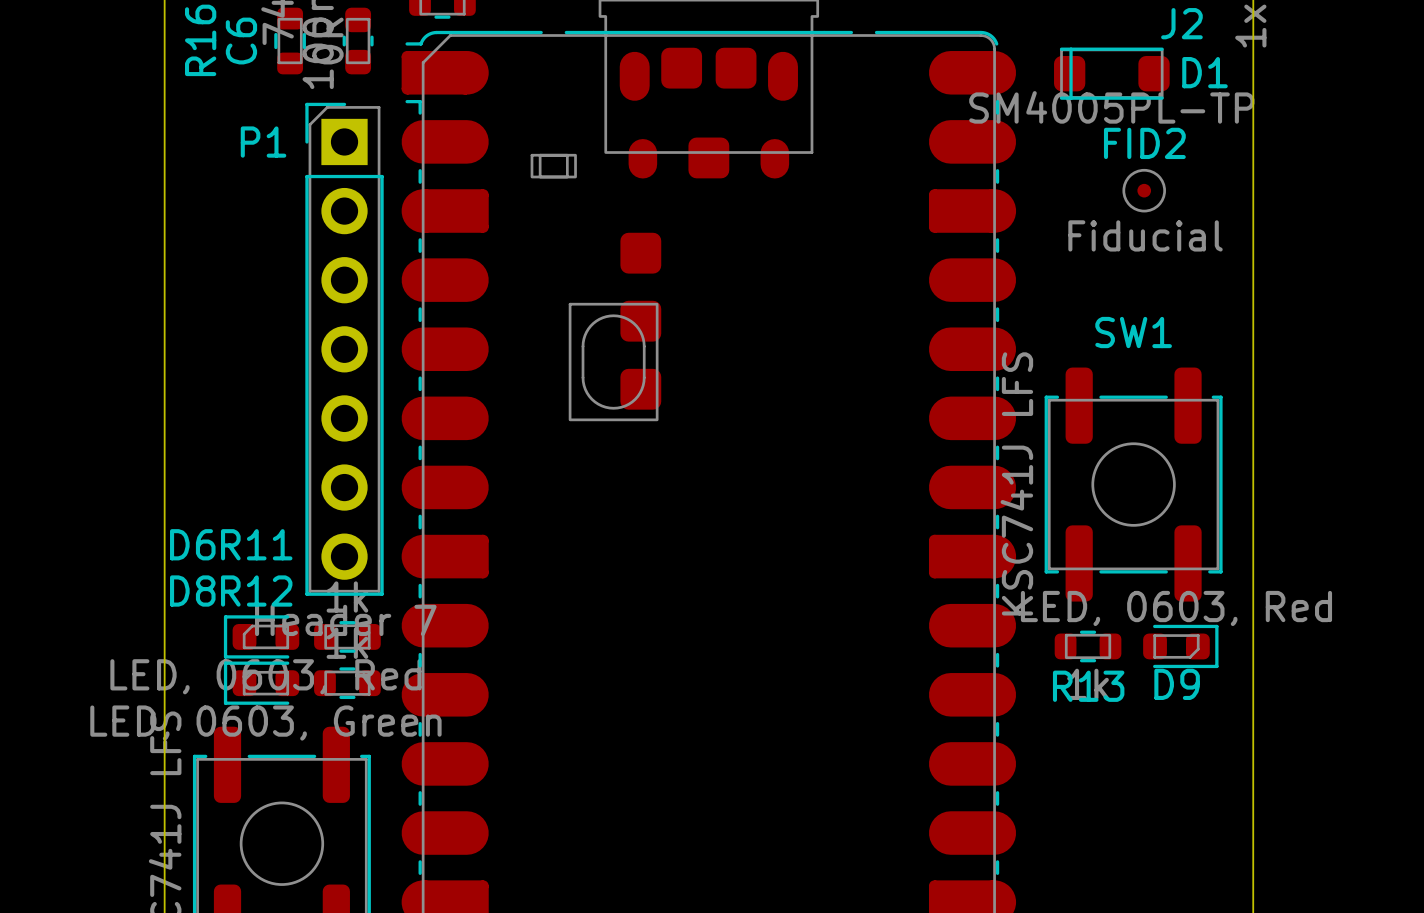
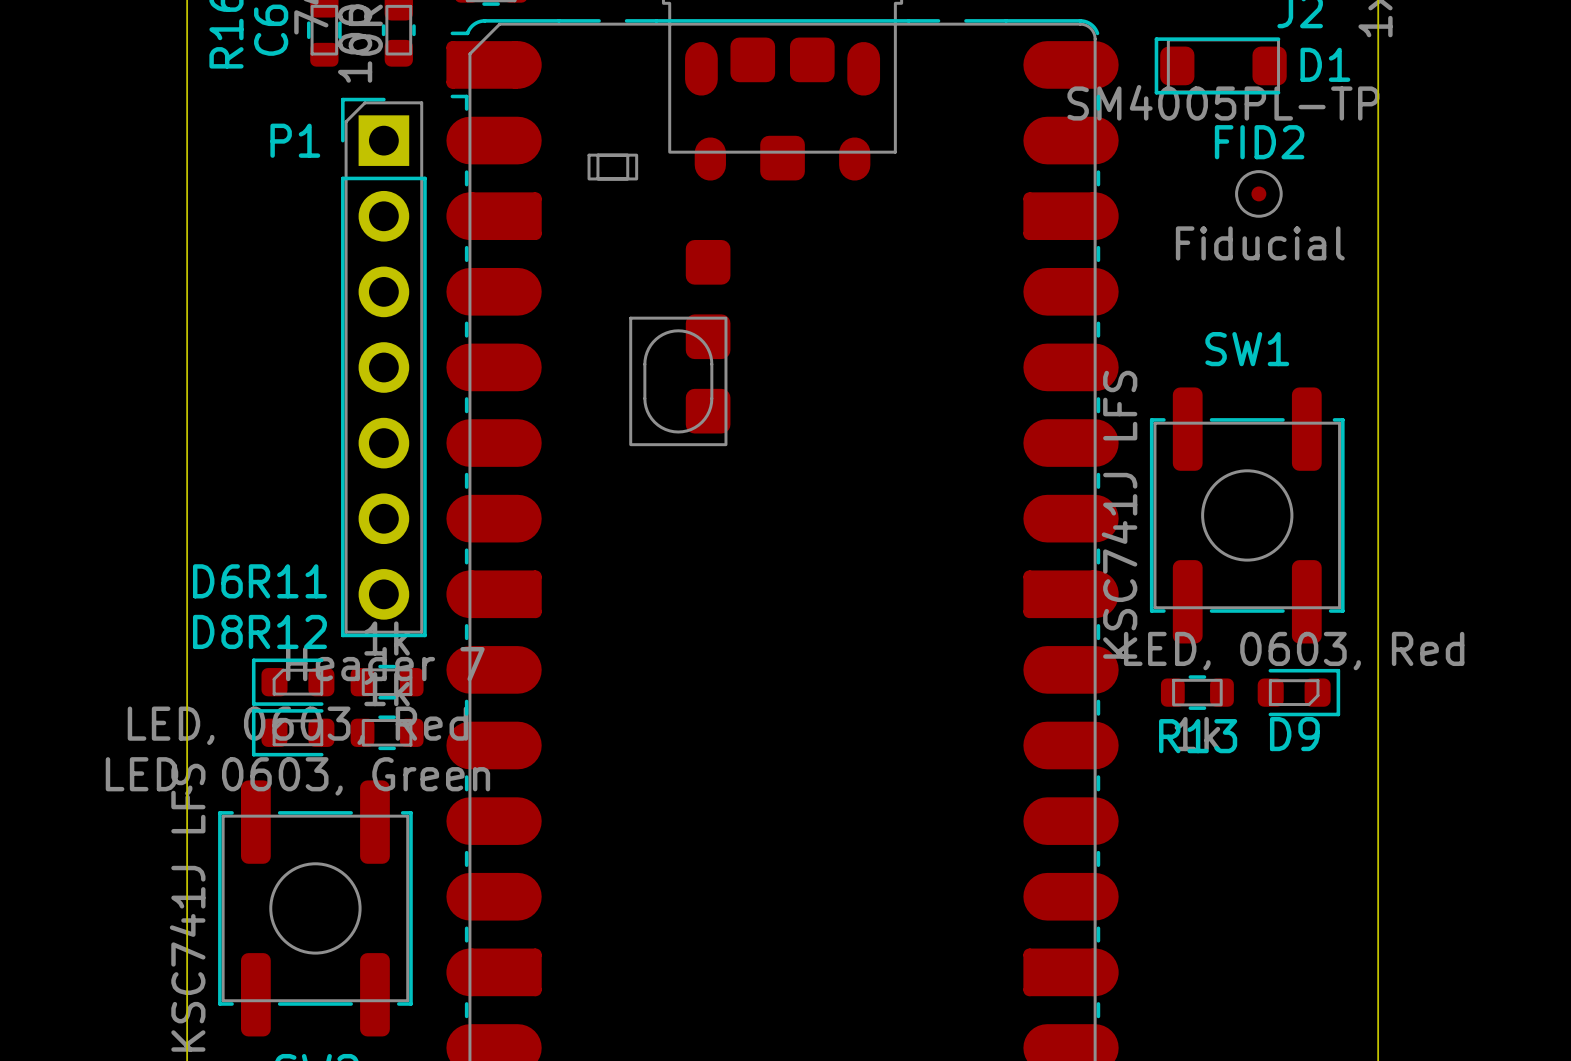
D1 footprint: [1054, 47, 1170, 100] -> [1154, 37, 1287, 95]

